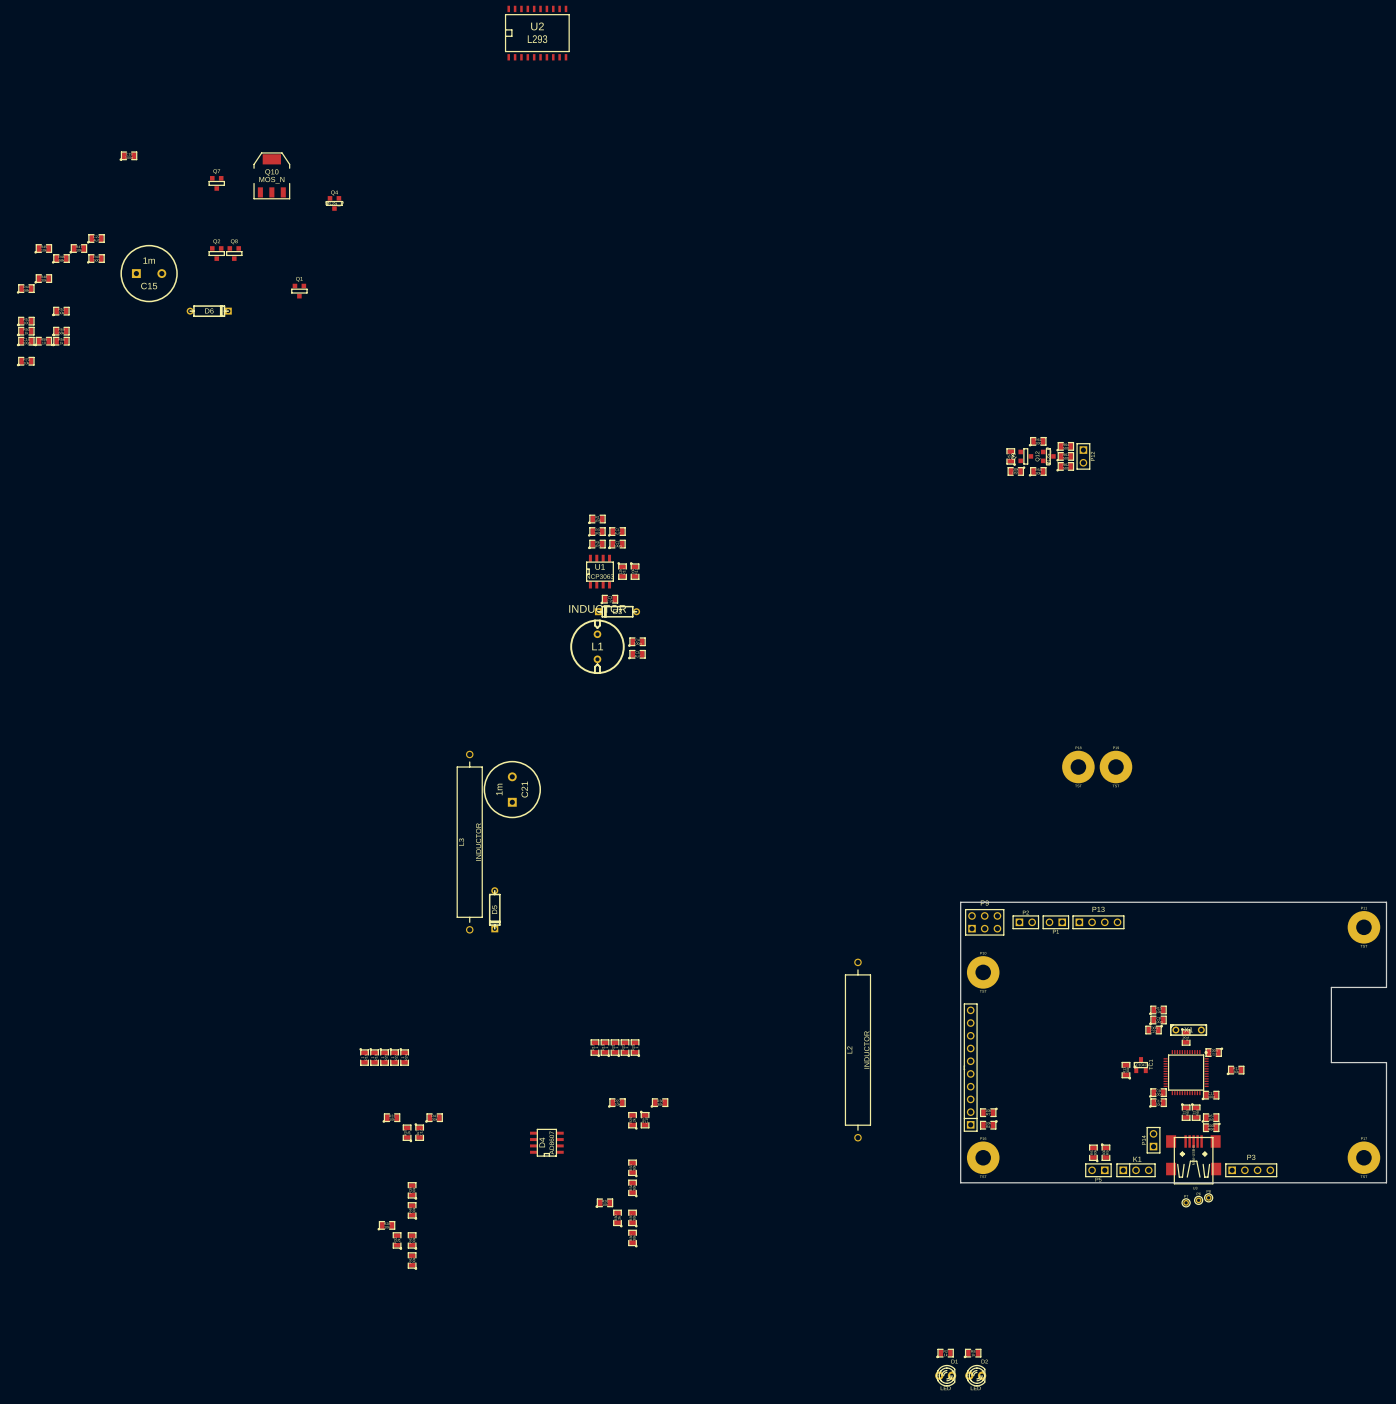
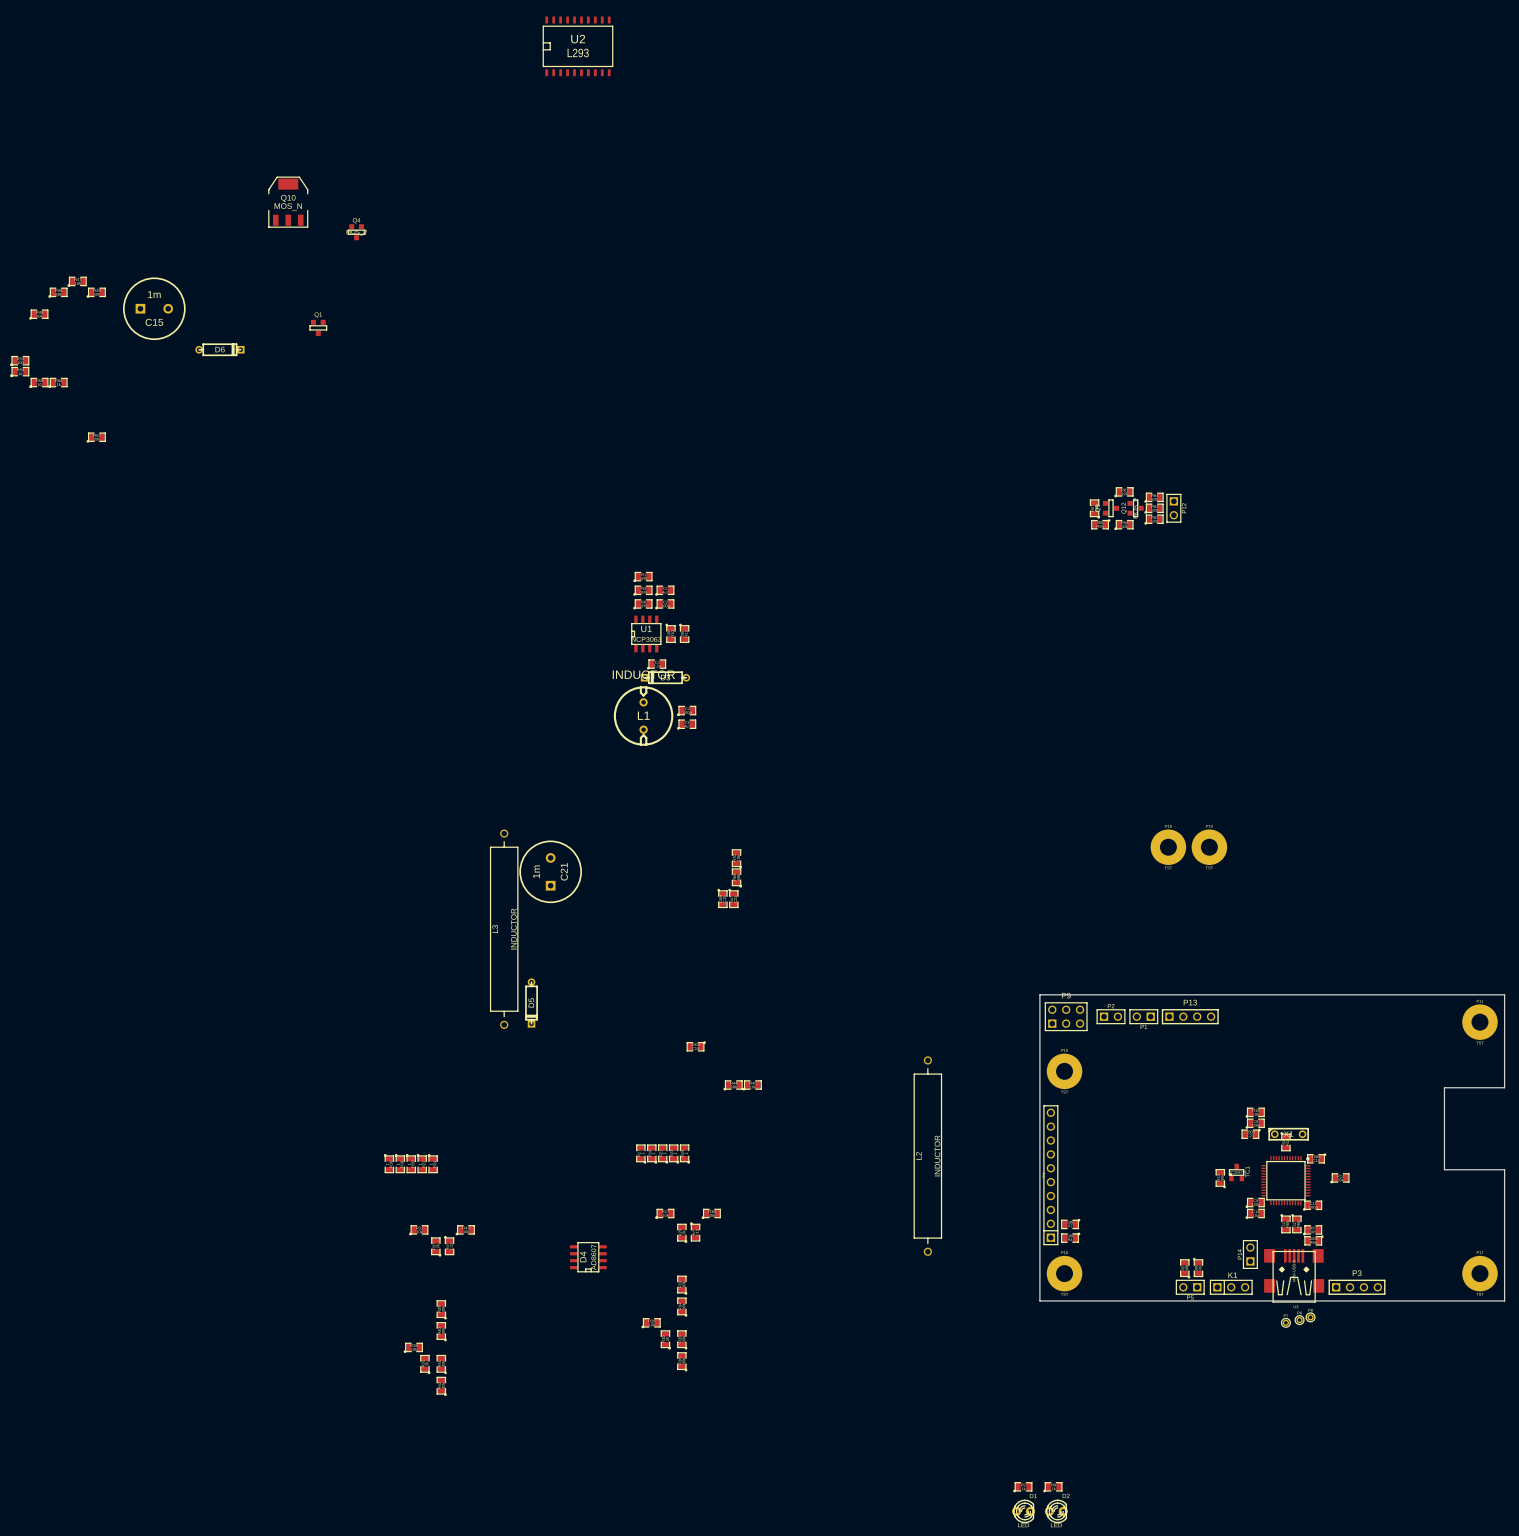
part rotation: 0° (128, 156) -> 90° clockwise (722, 898)
part position: (128, 156) -> (722, 898)
part: (216, 183) -> none
part rotation: 0° (95, 238) -> 90° clockwise (733, 898)
part position: (95, 238) -> (733, 898)
part position: (43, 248) -> (752, 1085)
part: (216, 253) -> none
part: (234, 253) -> none
part position: (25, 288) -> (733, 1085)
part position: (60, 311) -> (96, 437)
part rotation: 0° (60, 331) -> 90° counterclockwise (736, 877)
part position: (60, 331) -> (736, 877)
part rotation: 0° (25, 341) -> 180° (696, 1046)
part position: (25, 341) -> (696, 1046)
part rotation: 0° (25, 361) -> 90° counterclockwise (736, 858)
part position: (25, 361) -> (736, 858)

